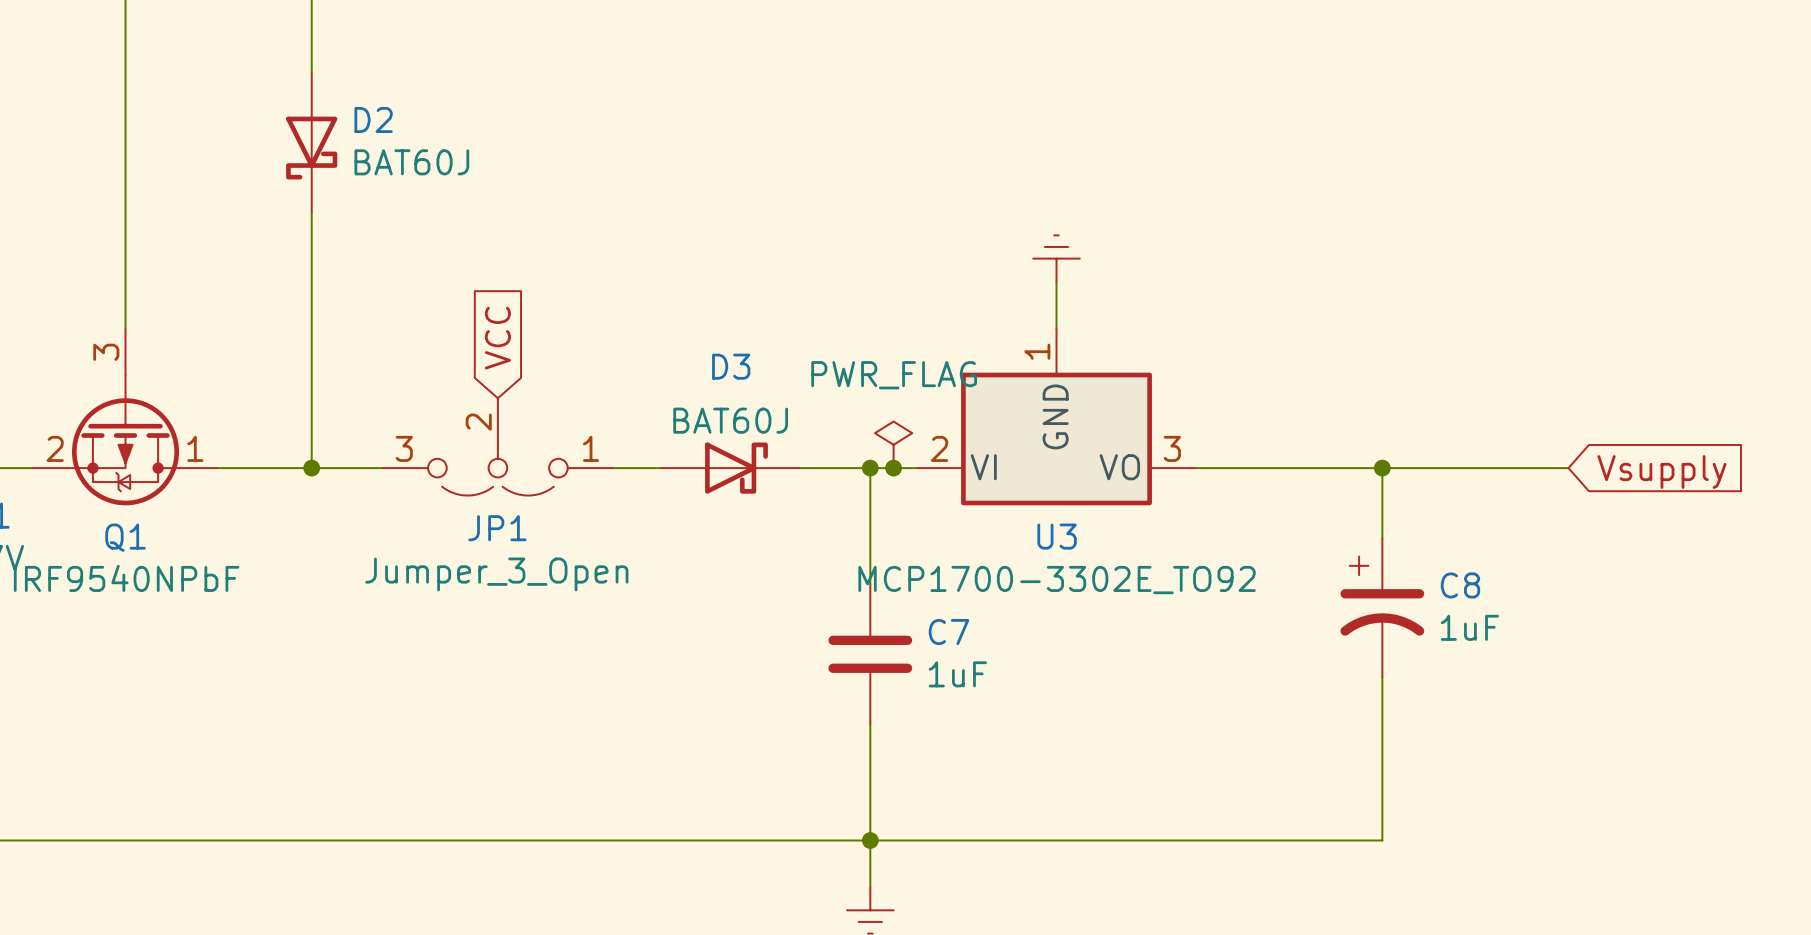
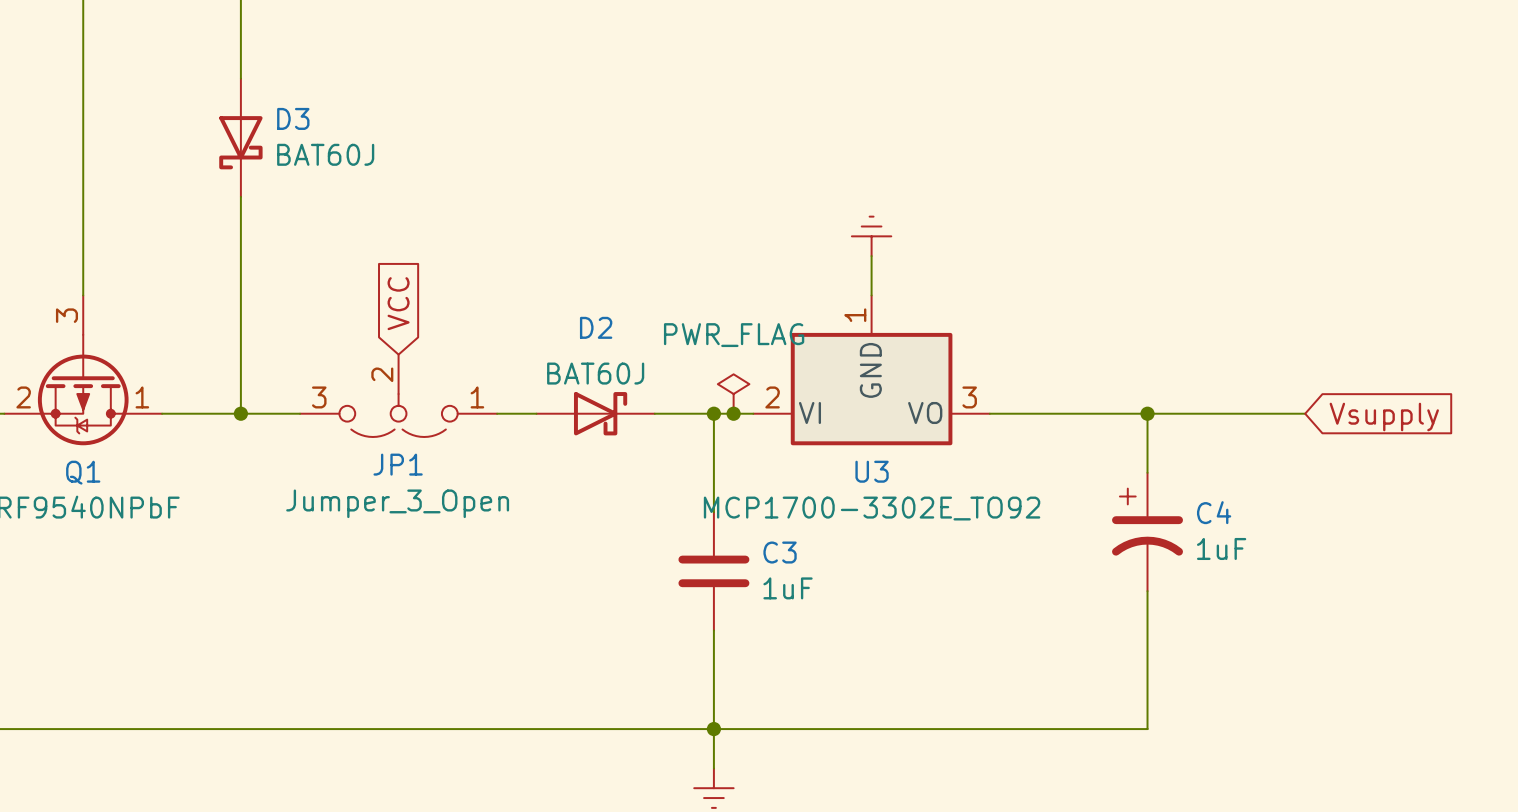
D2 name: D2 (373, 119) -> D3 (293, 118)
D3 name: D3 (731, 366) -> D2 (596, 327)
C8 name: C8 (1460, 585) -> C4 (1214, 512)
C7 name: C7 (948, 632) -> C3 (780, 552)

